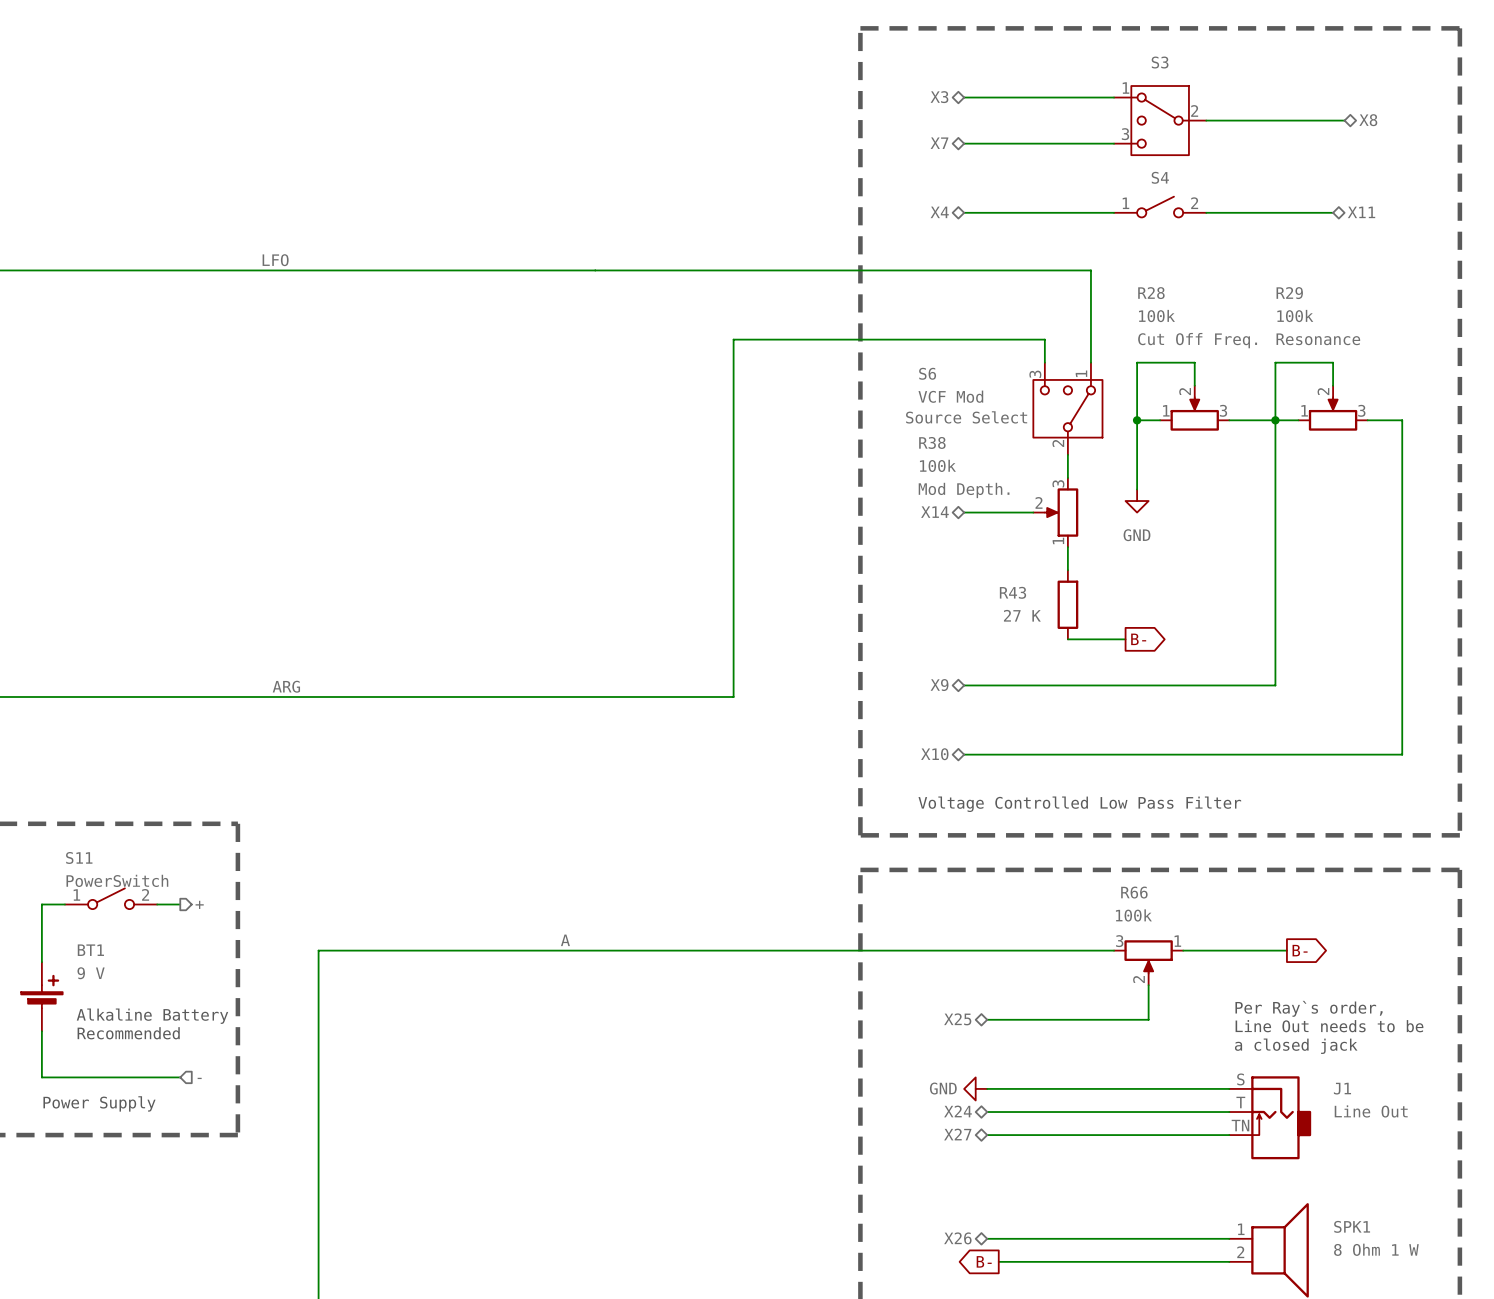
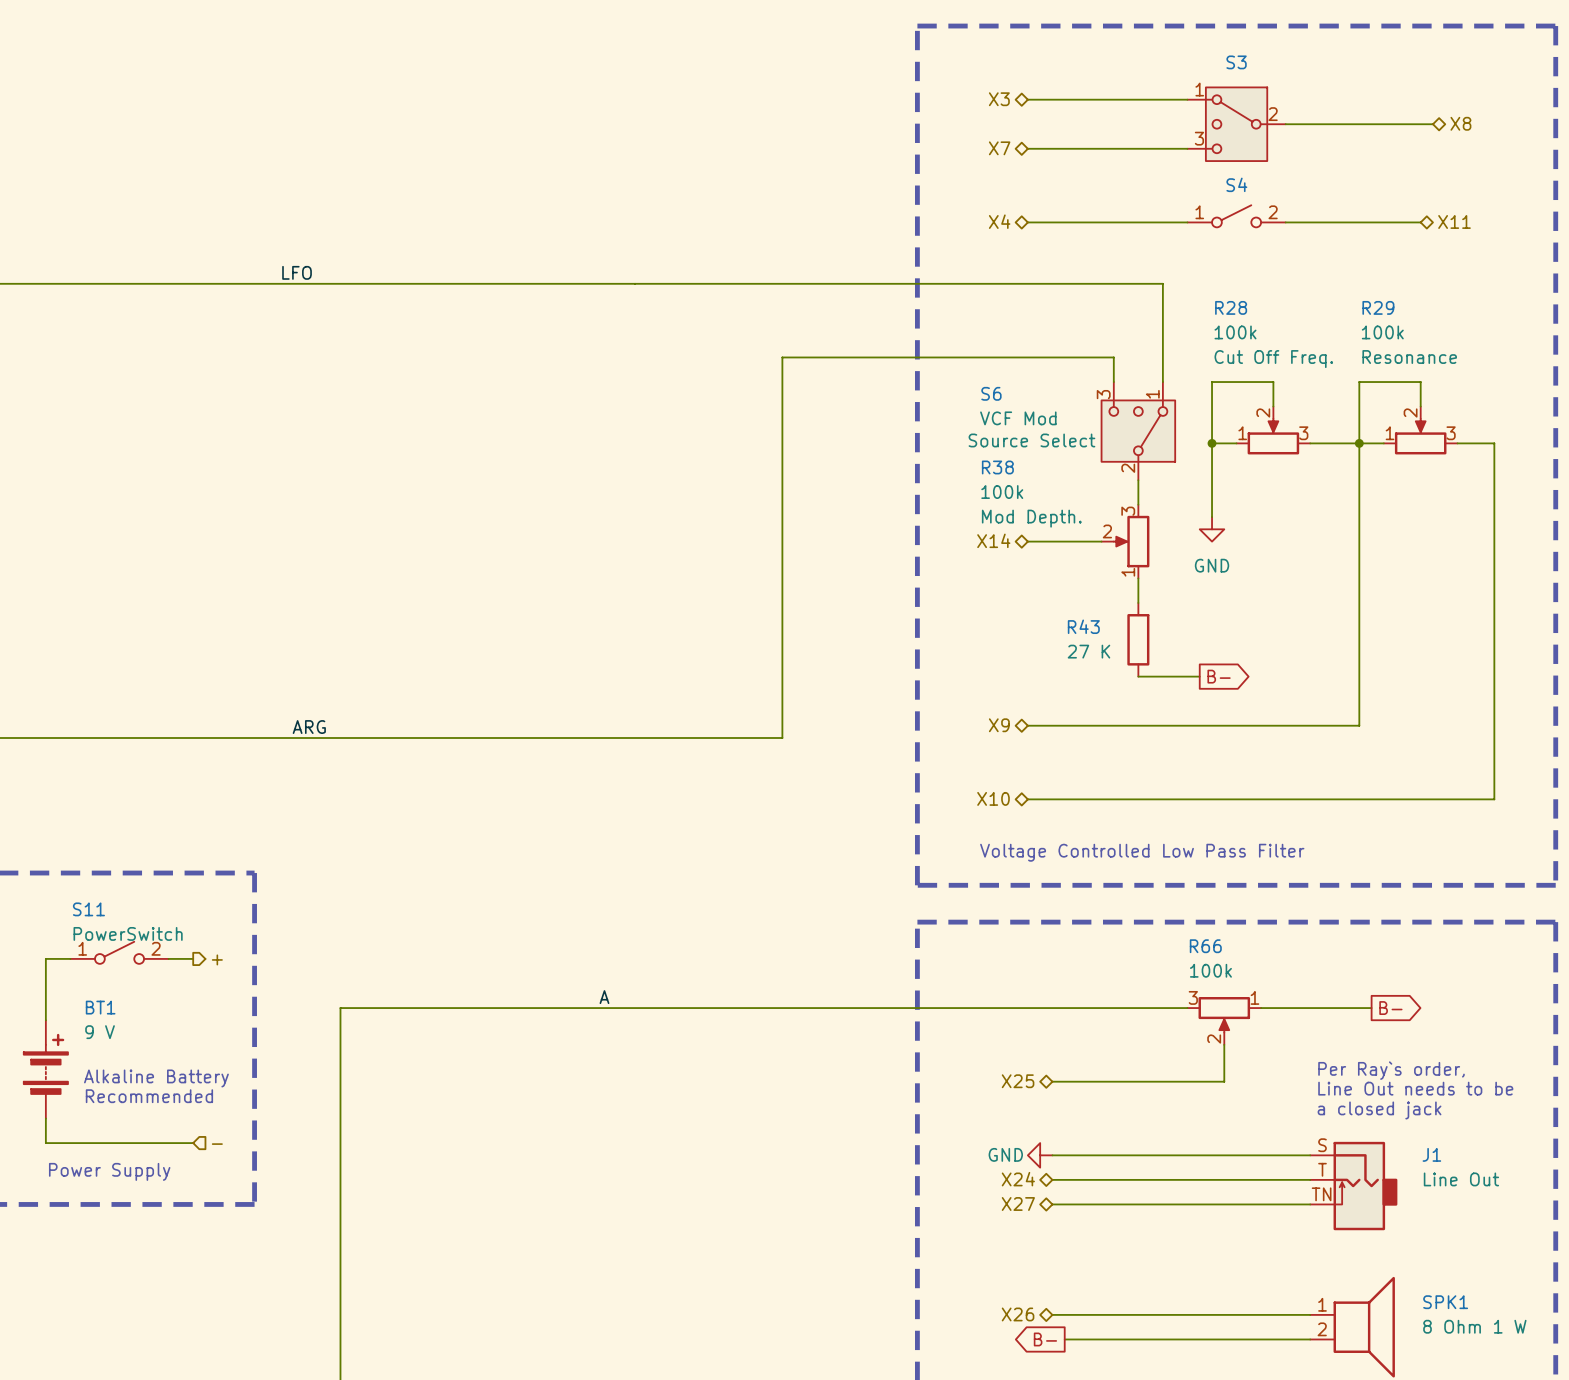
BT1 symbol: [21, 962, 63, 1032] -> [23, 1020, 68, 1119]

